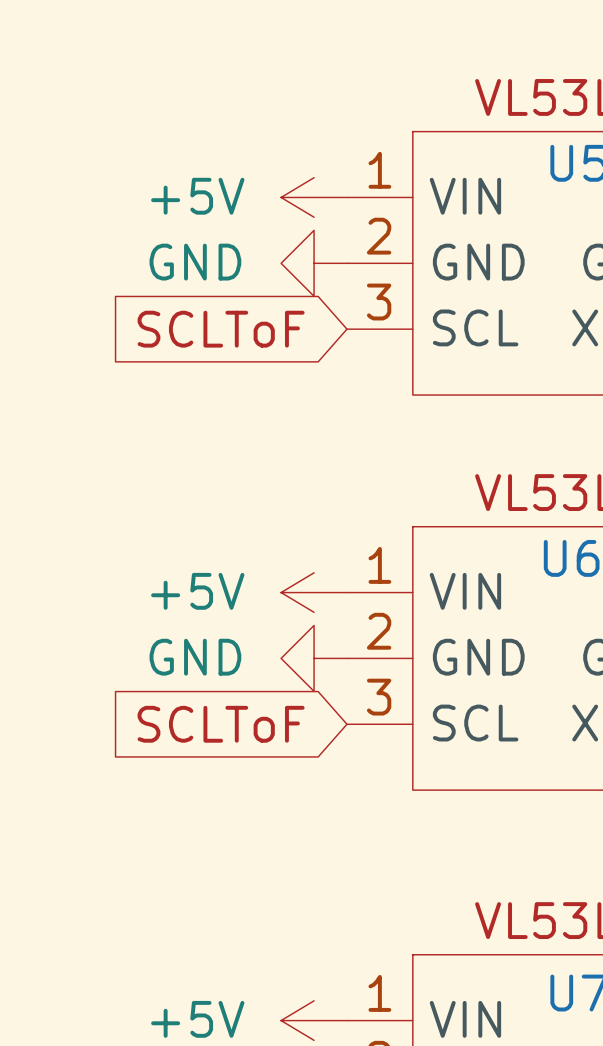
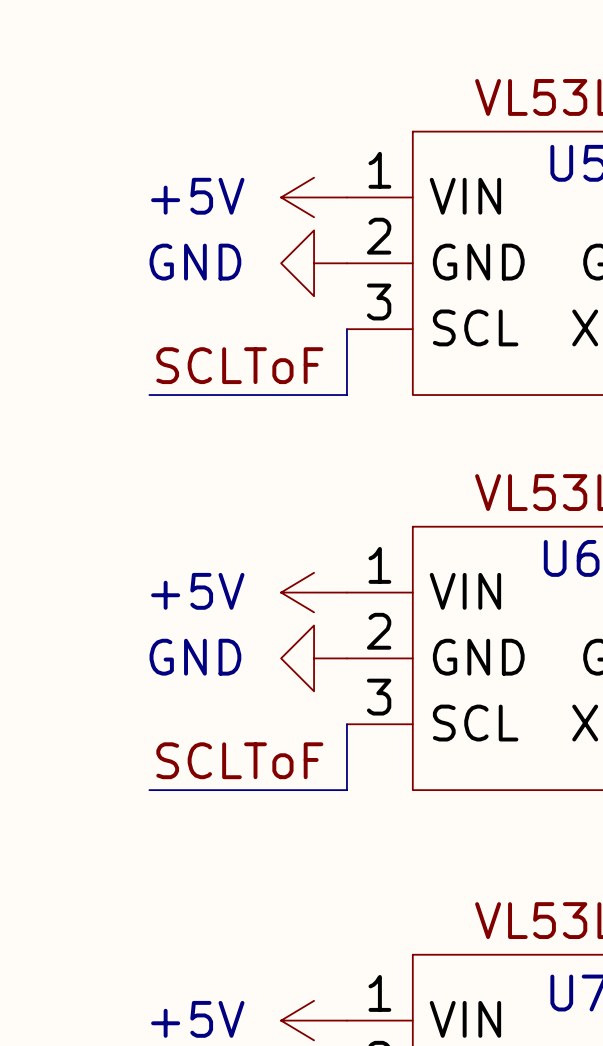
global label: SCLToF (221, 329) -> none
wire: none -> (346, 329) (346, 395) (149, 395)
label: none -> SCLToF (239, 365)
global label: SCLToF (221, 724) -> none
wire: none -> (346, 724) (346, 790) (149, 790)
label: none -> SCLToF (239, 760)

